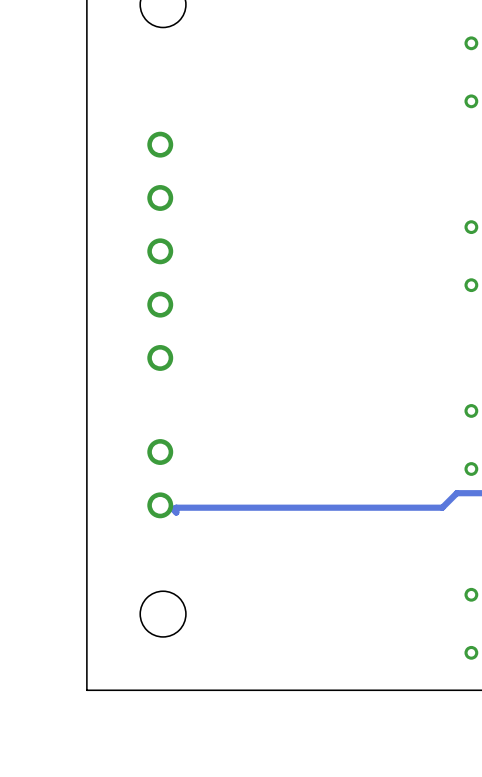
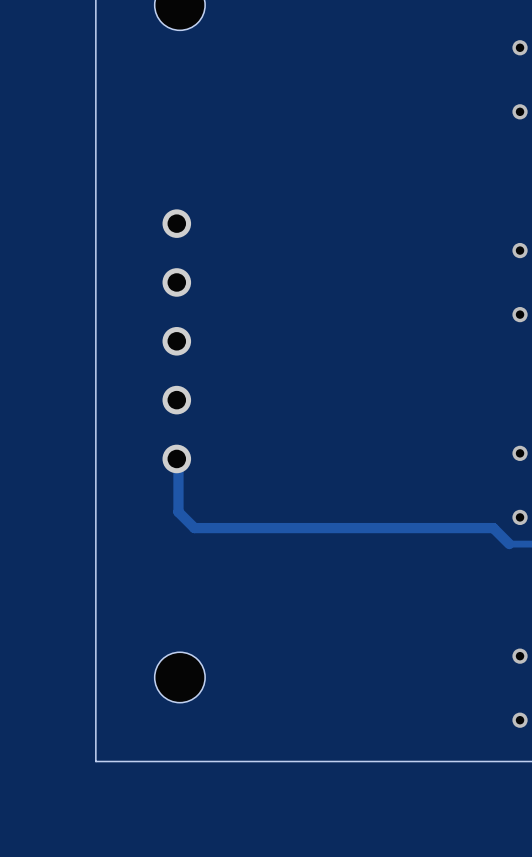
part position: (160, 251) -> (176, 341)
part: (160, 478) -> none
track: (461, 493) (456, 493) (442, 507) (176, 507) (176, 512) (169, 505) (160, 505) -> (509, 544) (493, 528) (194, 528) (178, 512) (178, 460) (176, 458)

